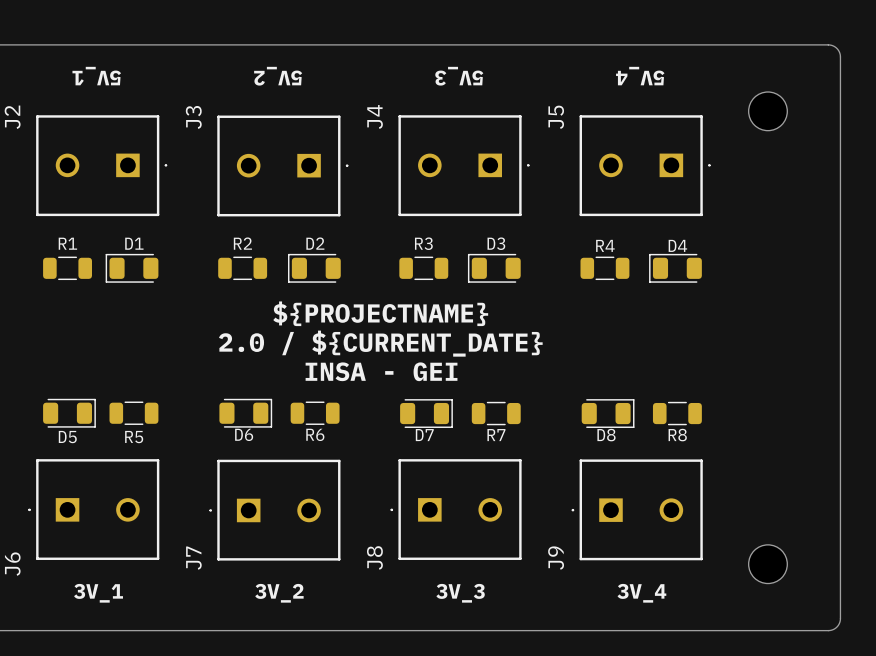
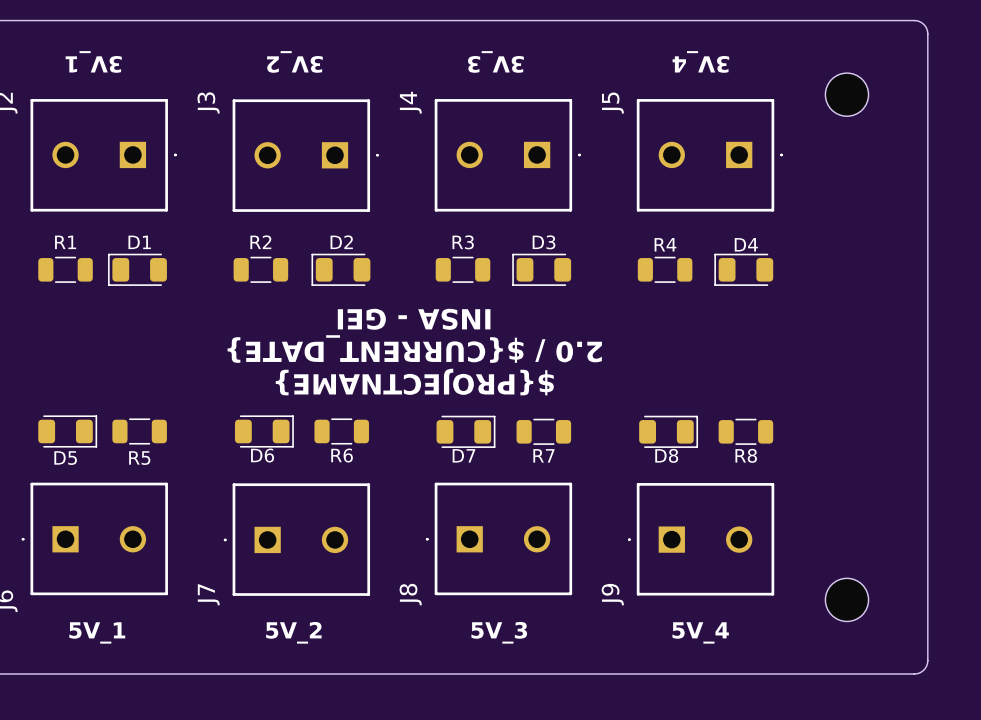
text: 5V_1 (96, 76) -> 3V_1 (93, 61)
text: 5V_2 (278, 76) -> 3V_2 (294, 61)
text: 5V_3 (459, 76) -> 3V_3 (495, 61)
text: 5V_4 (640, 76) -> 3V_4 (700, 61)
text rotation: 0° (380, 313) -> 180° (414, 382)
text rotation: 0° (380, 343) -> 180° (414, 349)
text rotation: 0° (381, 371) -> 180° (414, 319)
text: 3V_1 (98, 593) -> 5V_1 (97, 632)
text: 3V_2 (279, 593) -> 5V_2 (293, 632)
text: 3V_3 (460, 593) -> 5V_3 (499, 632)
text: 3V_4 (641, 593) -> 5V_4 (700, 632)

